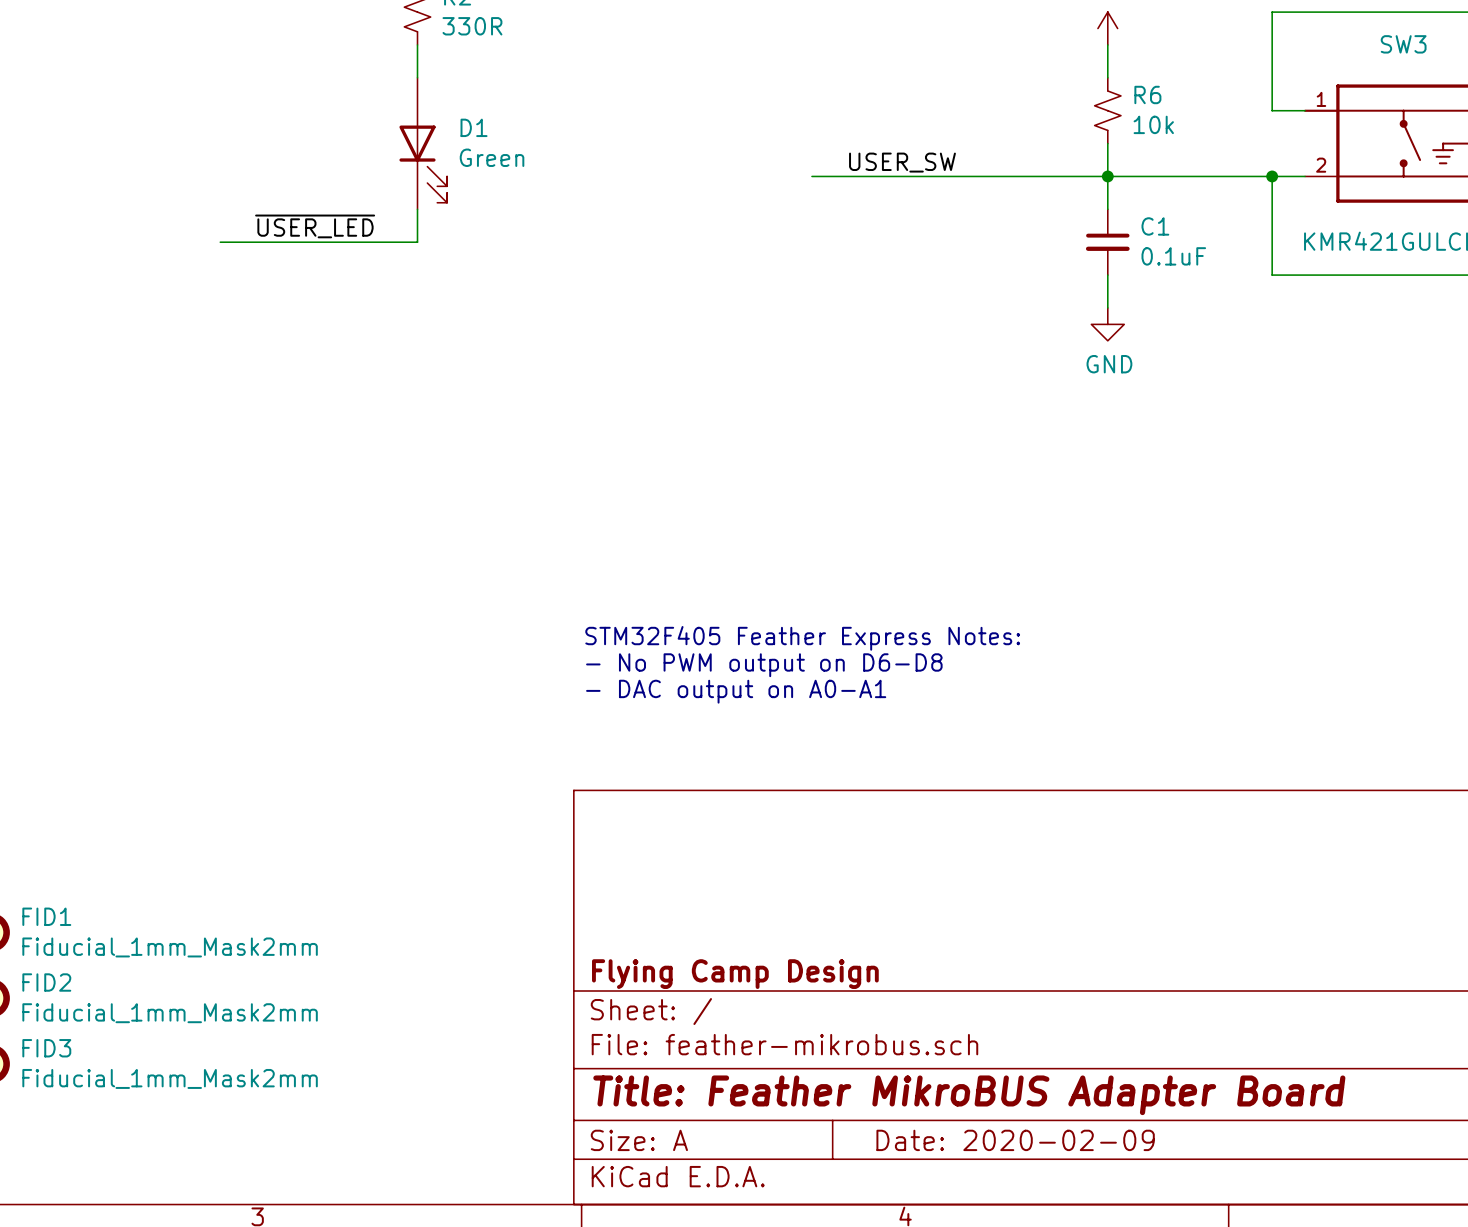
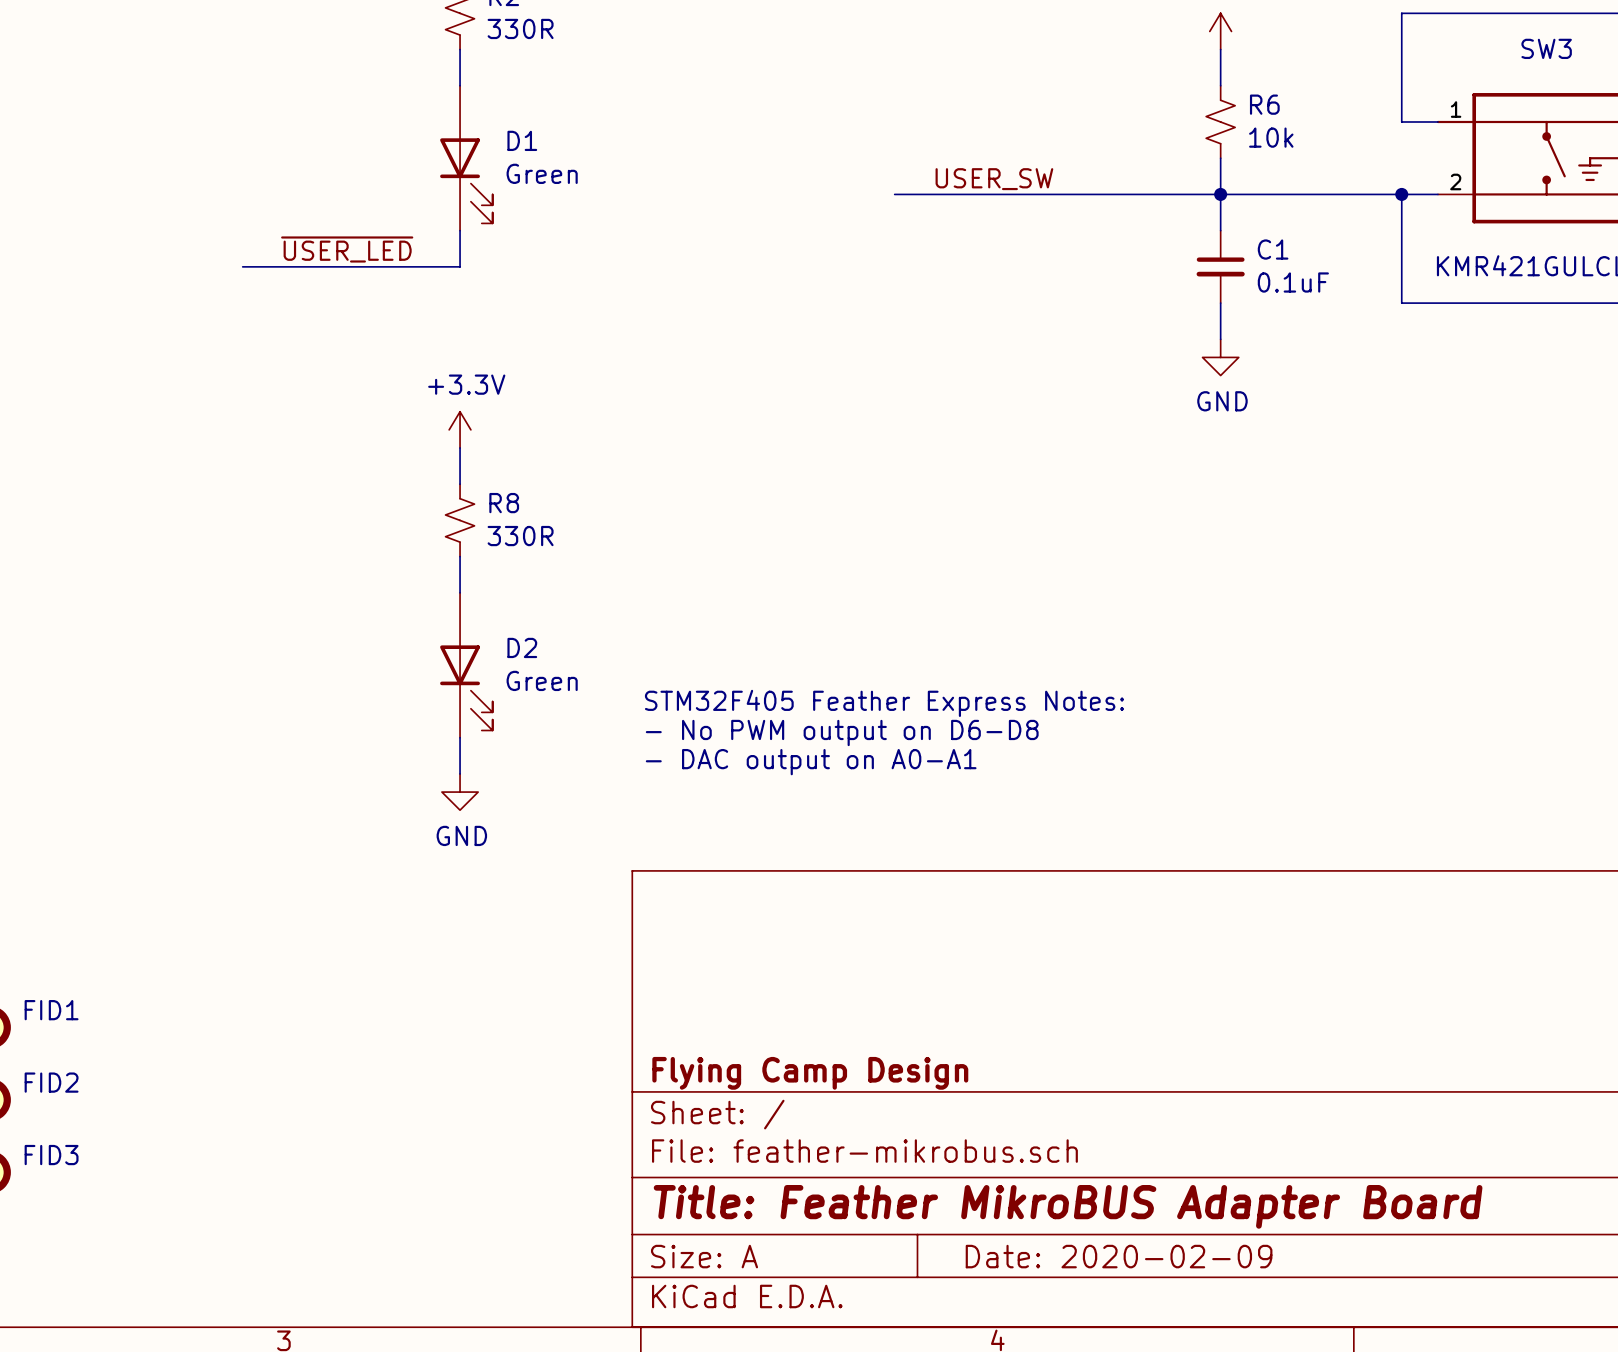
power symbol: none -> +3.3V (460, 429)
wire: none -> (460, 447) (460, 484)
R8: none -> (460, 520)
wire: none -> (460, 556) (460, 592)
D2: none -> (466, 665)
wire: none -> (460, 737) (460, 773)
power symbol: none -> GND (460, 792)
FID1 value: Fiducial_1mm_Mask2mm (170, 947) -> none
FID2 value: Fiducial_1mm_Mask2mm (170, 1013) -> none
FID3 value: Fiducial_1mm_Mask2mm (170, 1078) -> none

